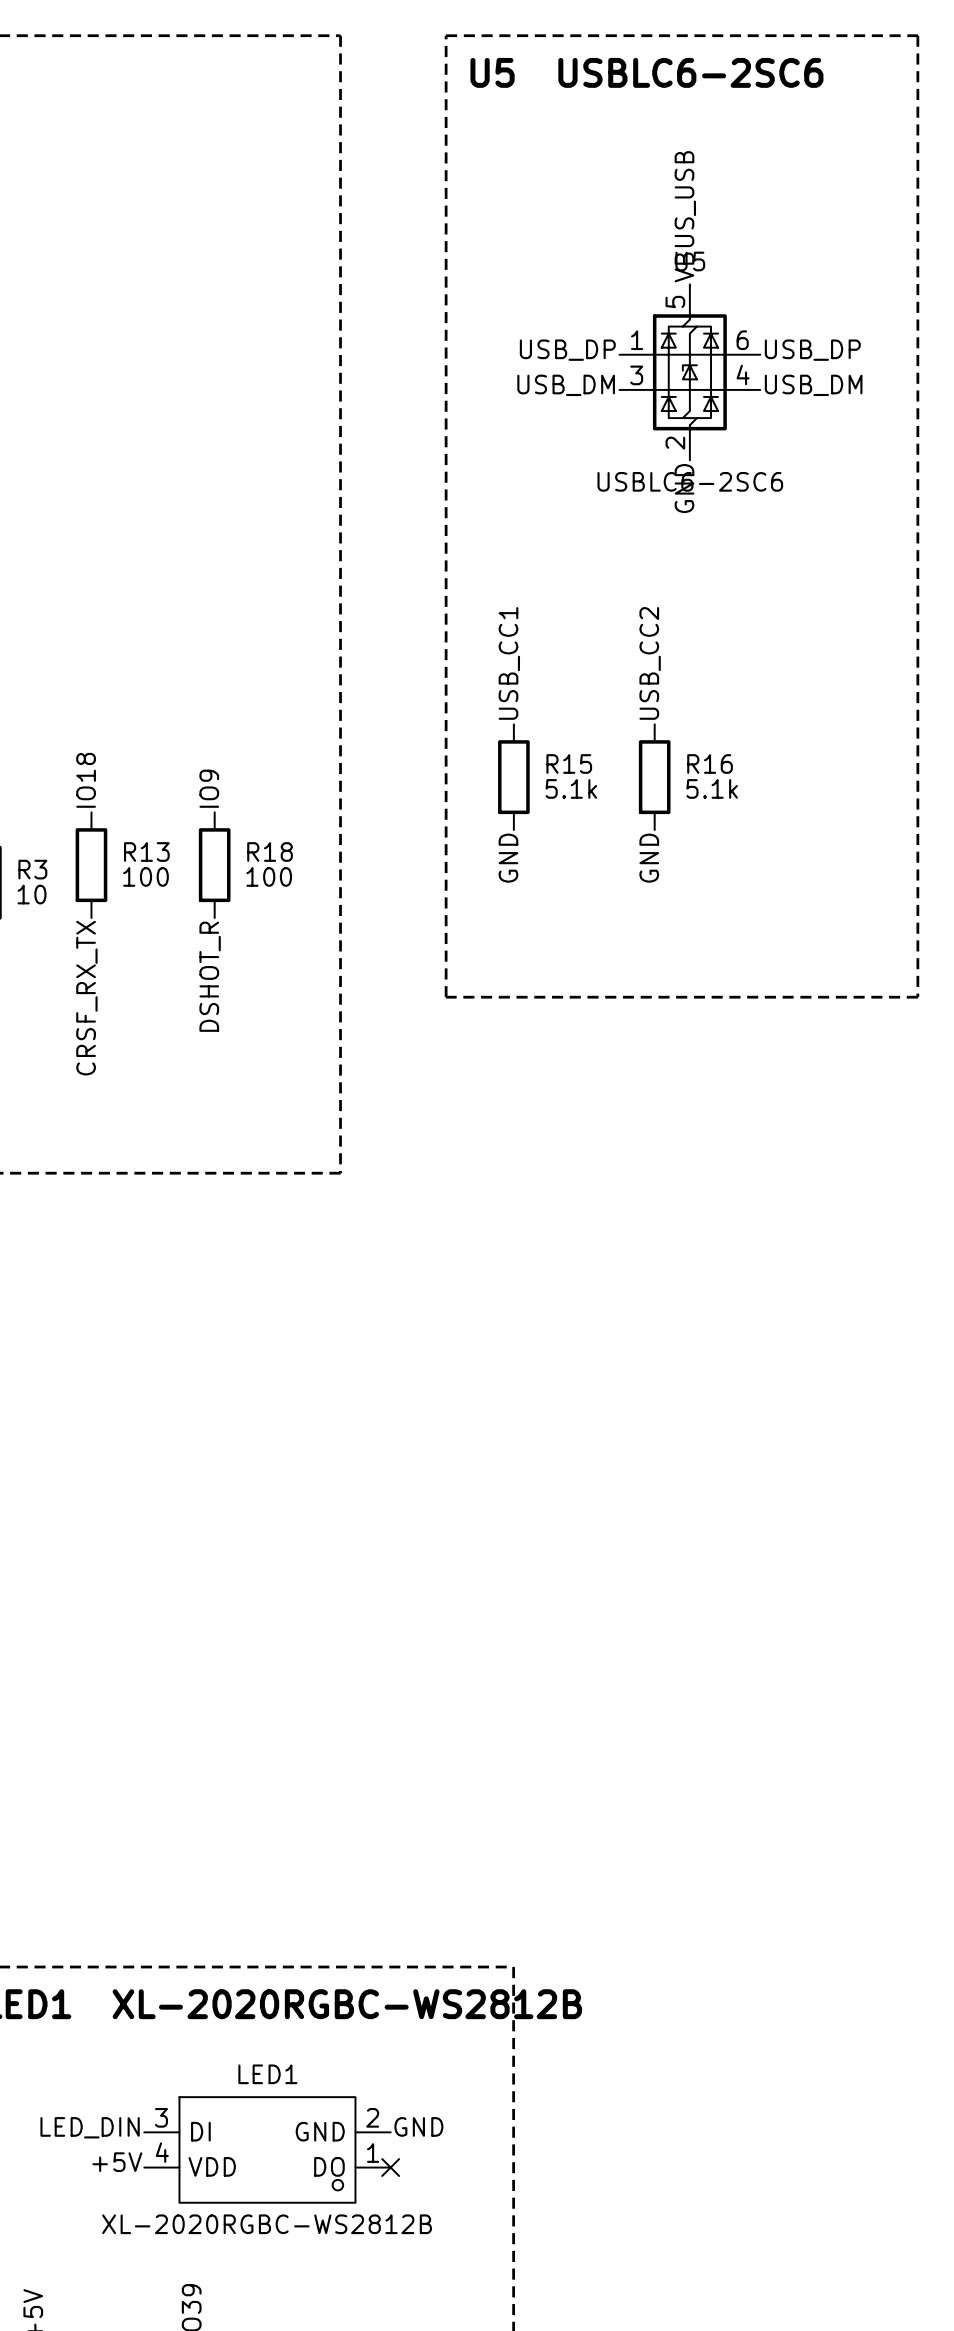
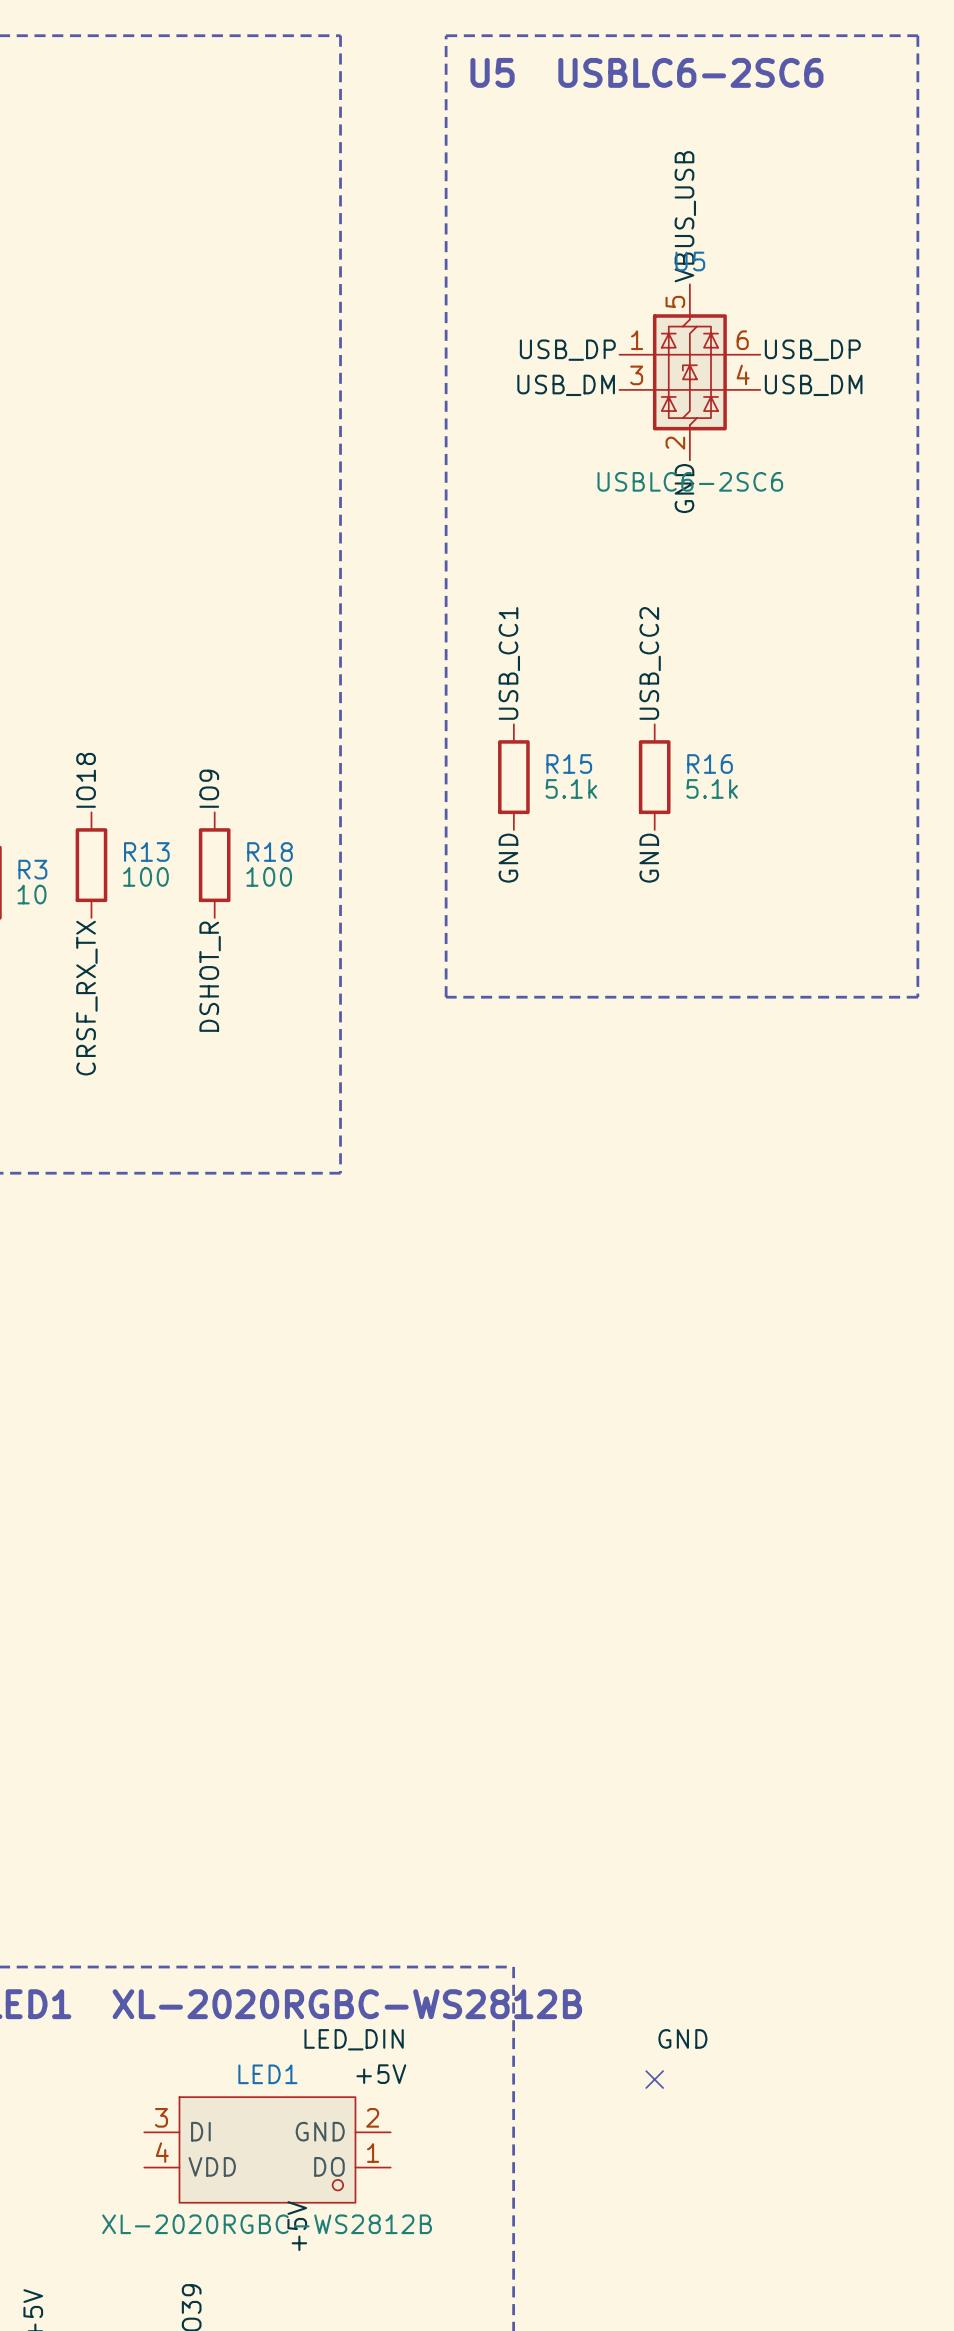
label: none -> GND (682, 2038)
label: none -> LED_DIN (354, 2039)
label: none -> +5V (381, 2074)
no-connect mark: none -> (654, 2079)
label: GND (418, 2126) -> none
label: LED_DIN (90, 2127) -> none
label: +5V (117, 2162) -> none
no-connect mark: (390, 2167) -> none
label: none -> +5V (297, 2226)

